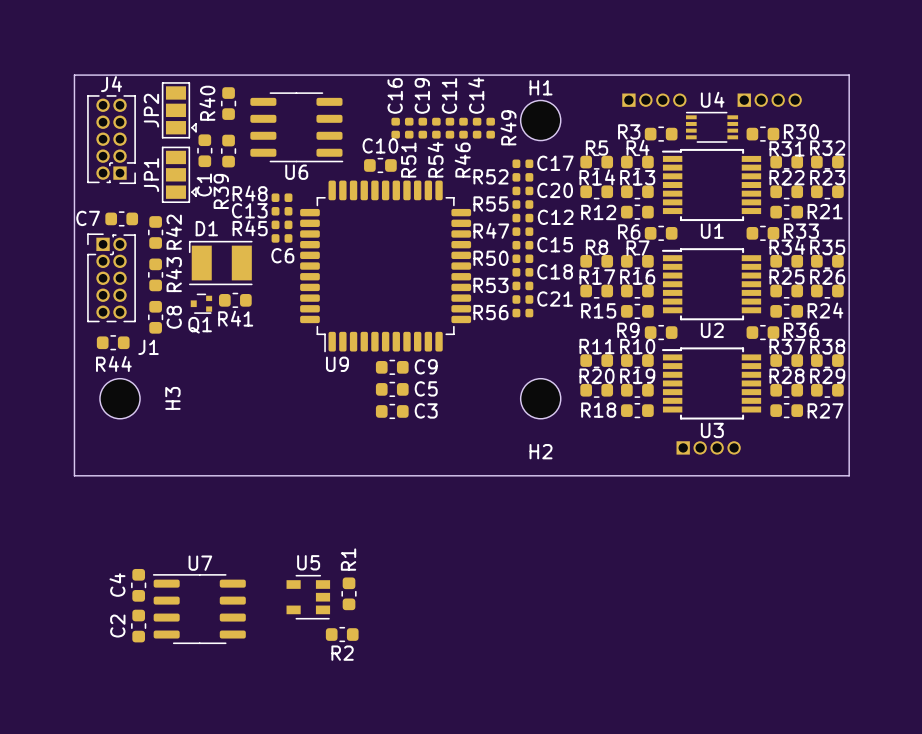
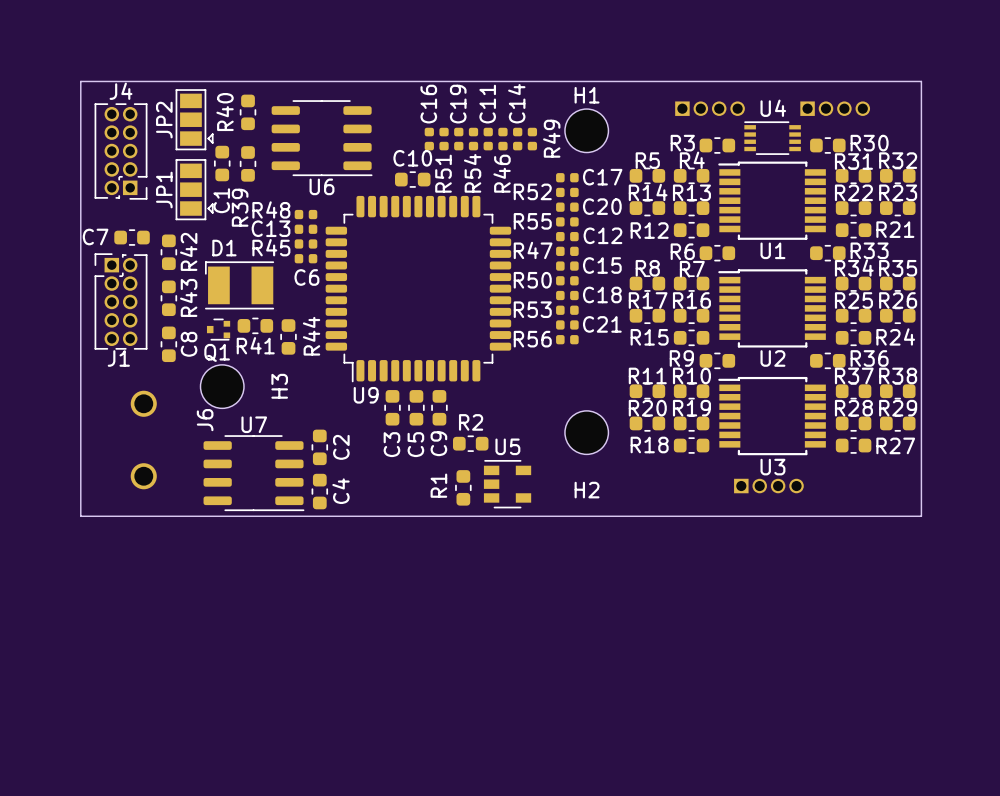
R44 rotation: 0° (113, 342) -> 90° clockwise (288, 336)
R44 position: (113, 342) -> (288, 336)
J1 name position: J1 (148, 347) -> J1 (118, 358)
R44 name position: R44 (113, 363) -> R44 (311, 336)
C9 rotation: 0° (392, 367) -> 90° clockwise (439, 407)
C5 rotation: 0° (392, 389) -> 90° clockwise (416, 407)
H3 position: (120, 398) -> (222, 386)
J6: none -> (143, 440)
C3 rotation: 0° (392, 411) -> 90° clockwise (392, 407)
C3 position: (392, 411) -> (392, 407)
R1 name position: R1 (348, 559) -> R1 (438, 485)
C4 name position: C4 (117, 585) -> C4 (341, 491)
C4 position: (138, 585) -> (319, 491)
R1 position: (349, 593) -> (463, 487)
U5 rotation: 0° (308, 597) -> 180° (507, 484)
U5 position: (308, 597) -> (507, 484)
U7 rotation: 0° (199, 609) -> 180° (253, 473)
U7 position: (199, 609) -> (253, 473)
C2 name position: C2 (117, 626) -> C2 (341, 447)
C2 position: (138, 626) -> (319, 447)
R2 position: (342, 634) -> (470, 443)
R2 name position: R2 (342, 653) -> R2 (471, 422)

